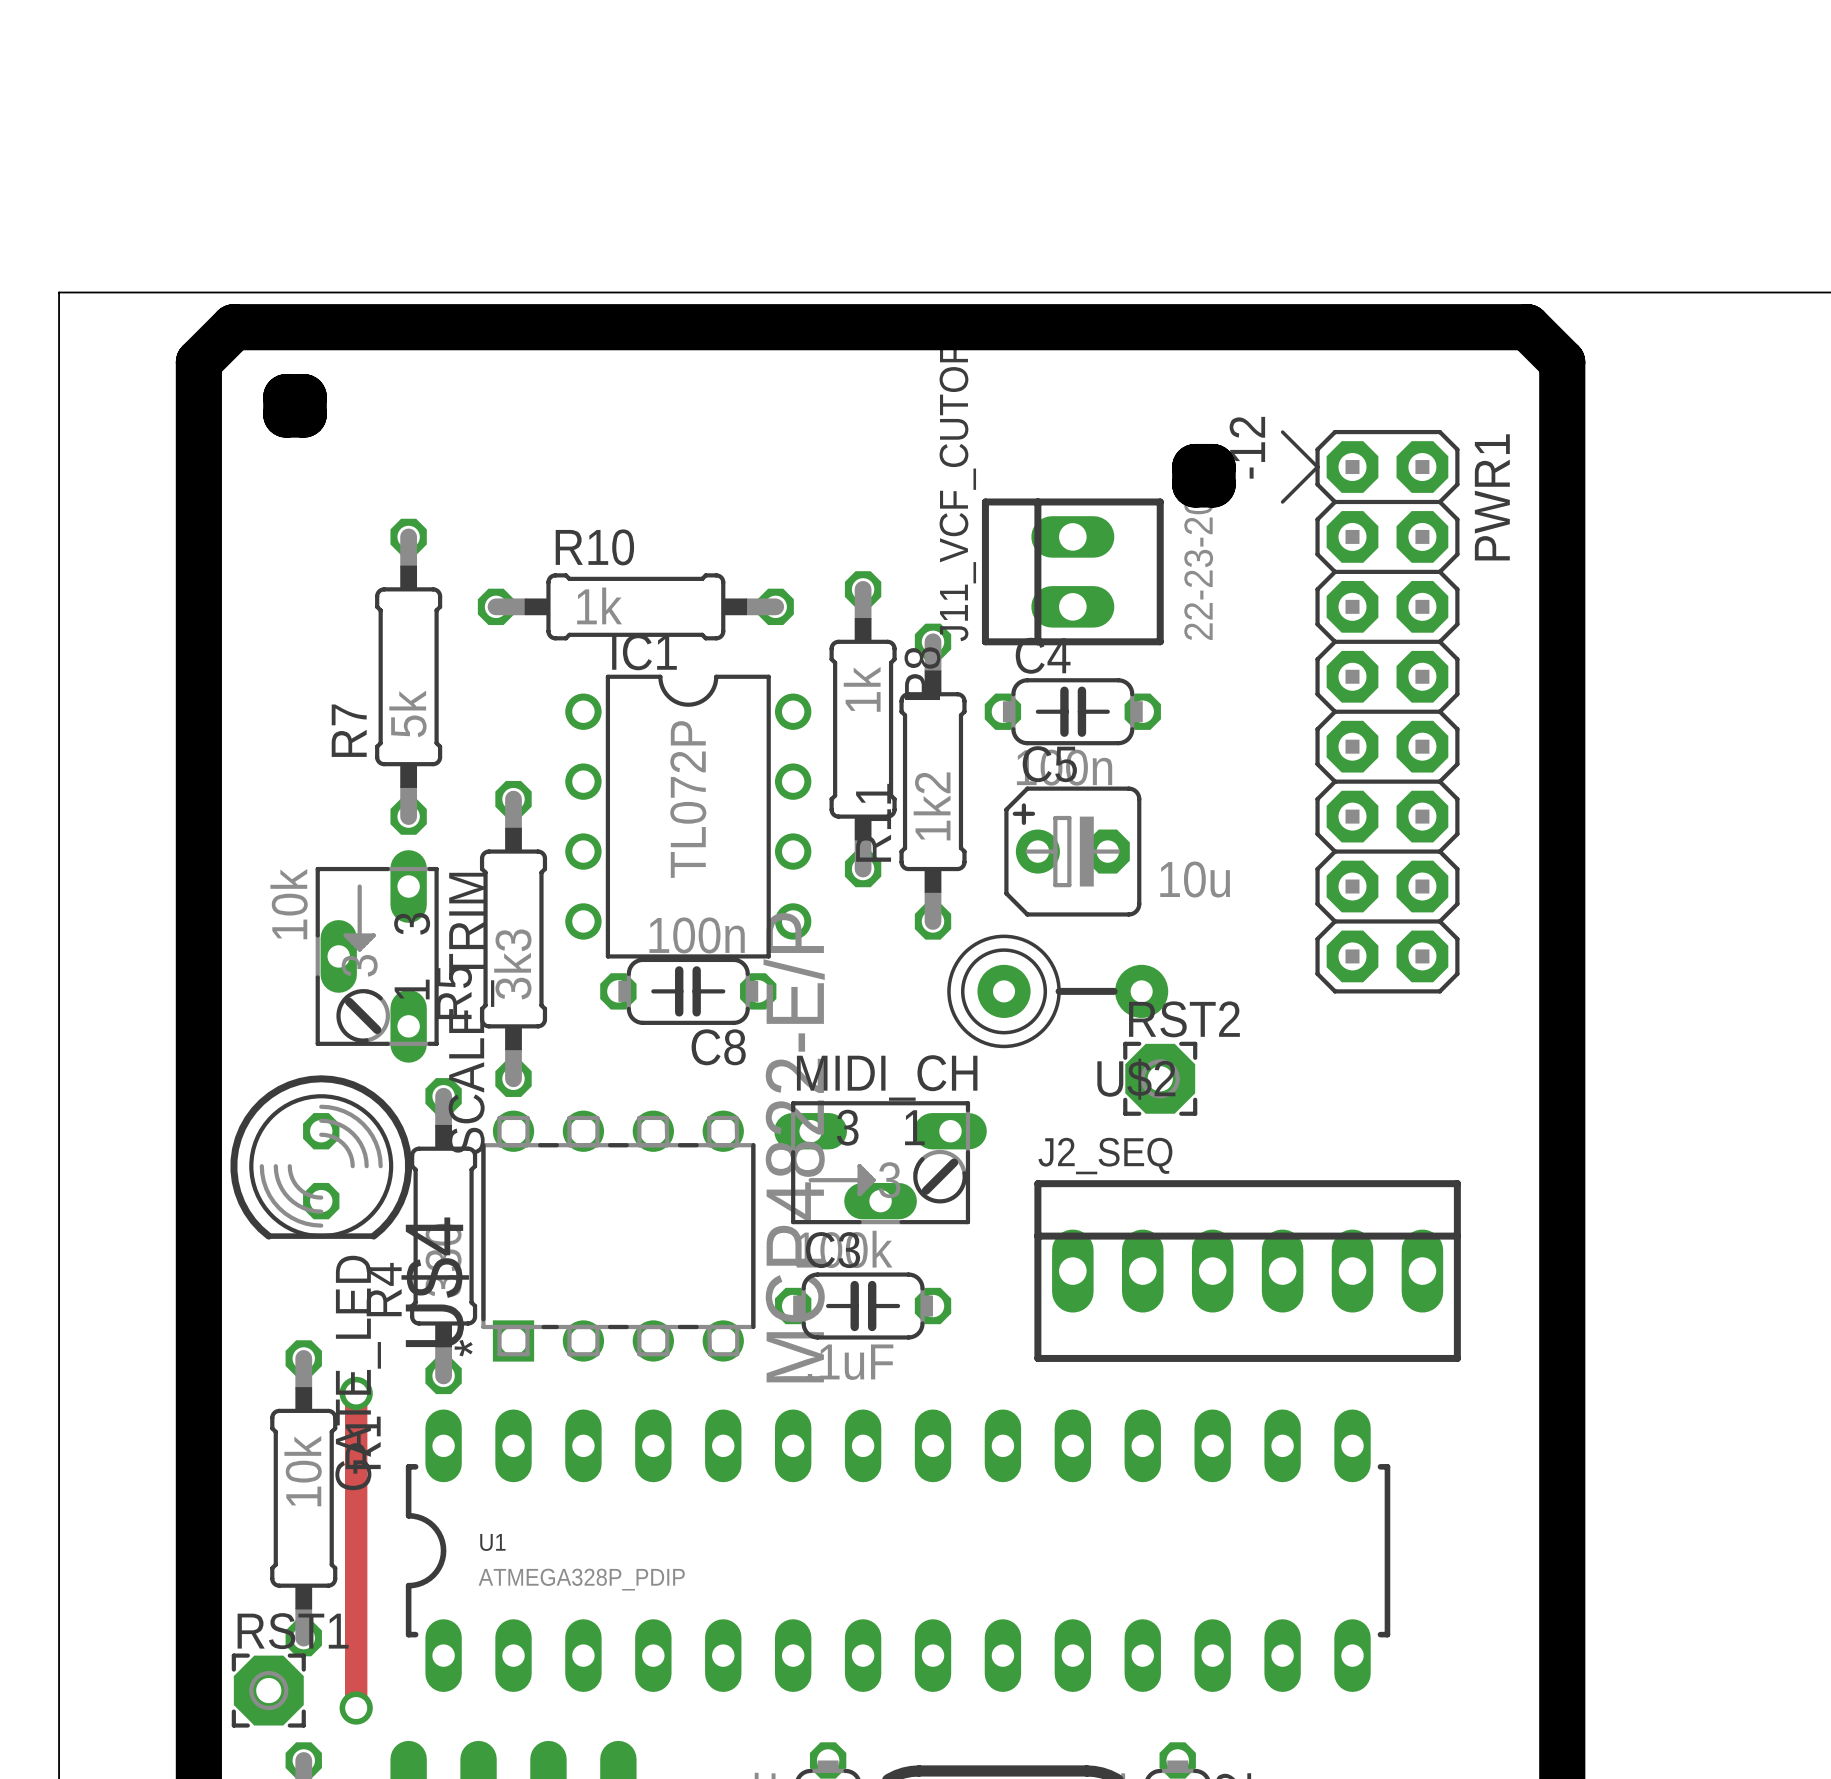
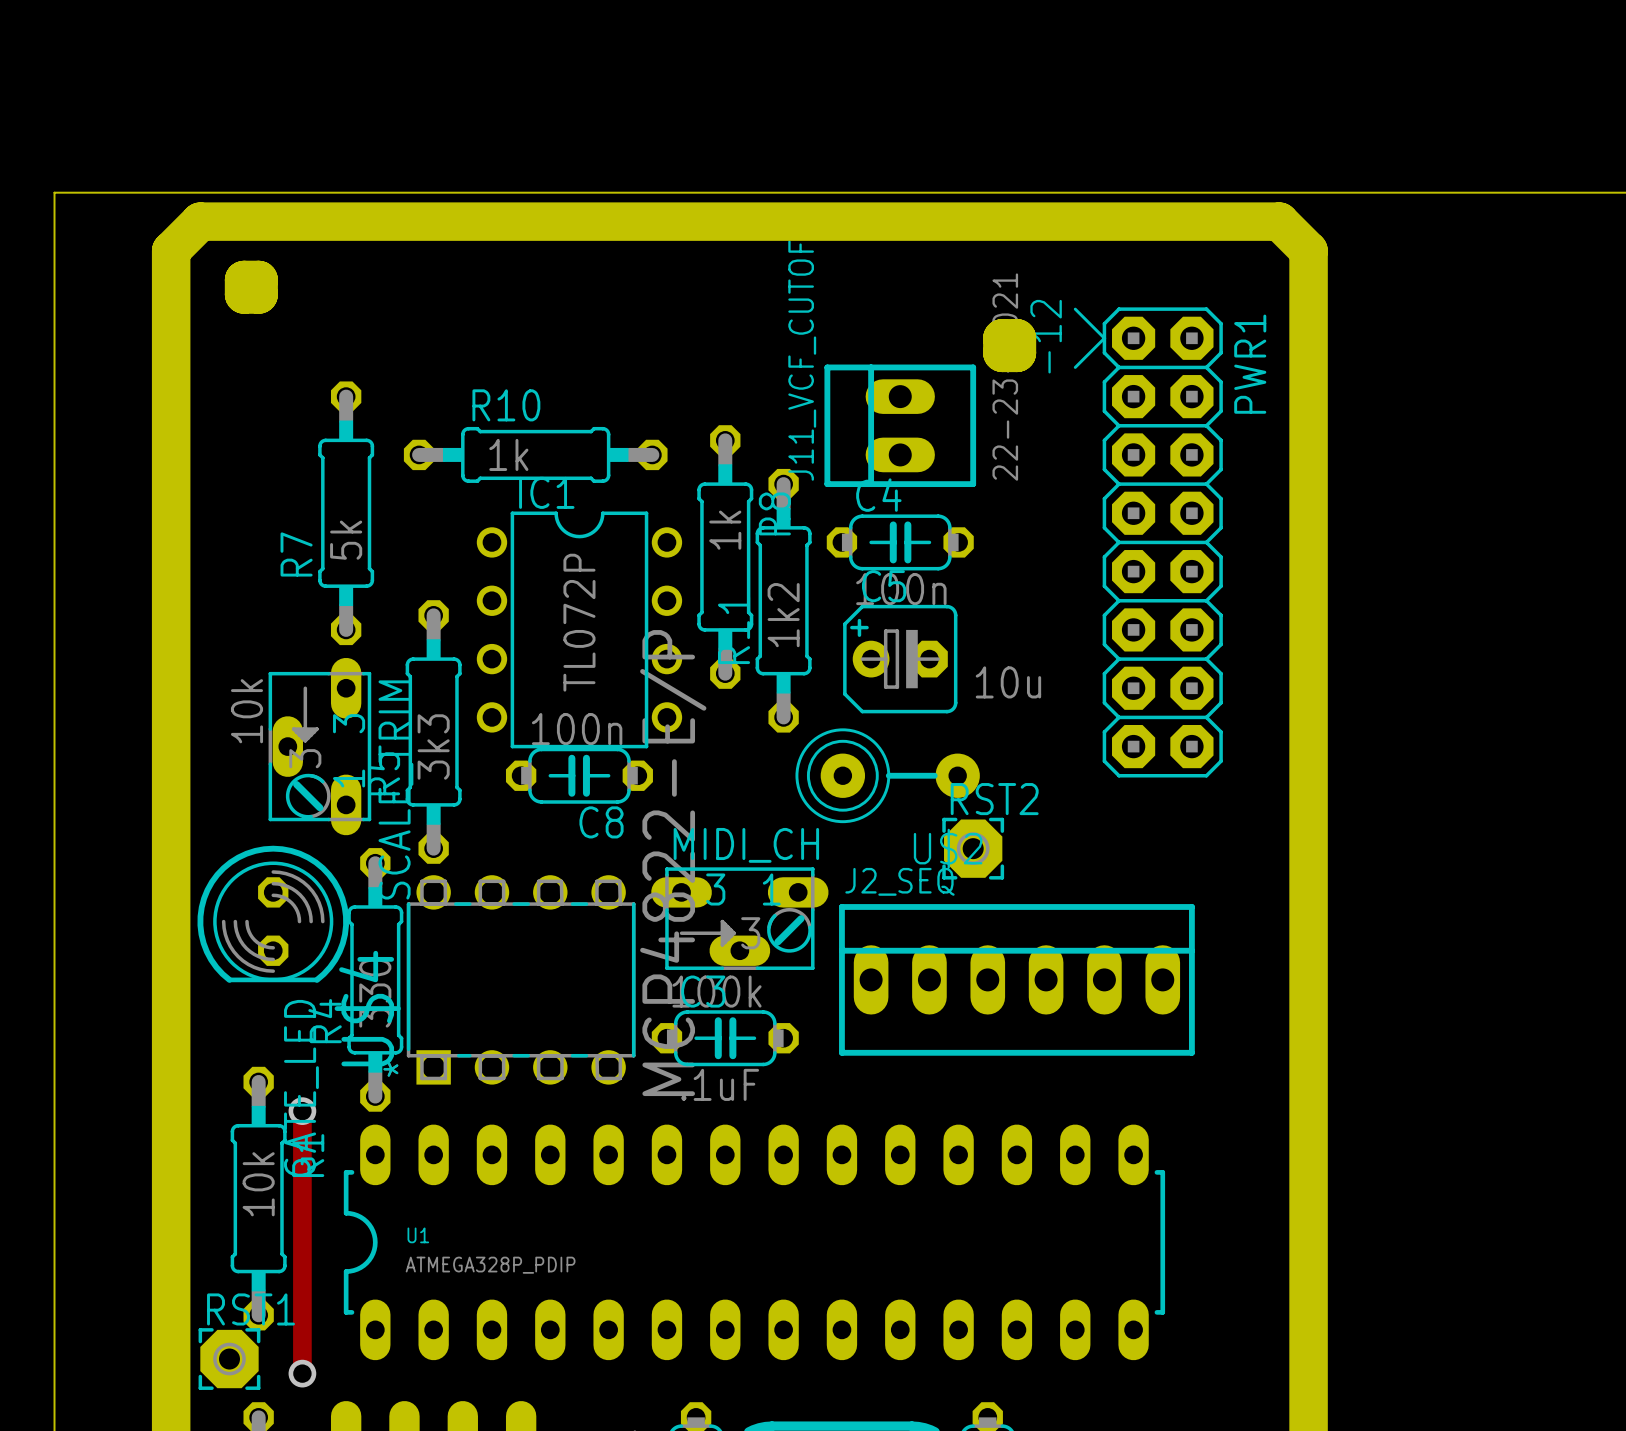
J2_SEQ position: (1247, 1271) -> (1016, 979)

